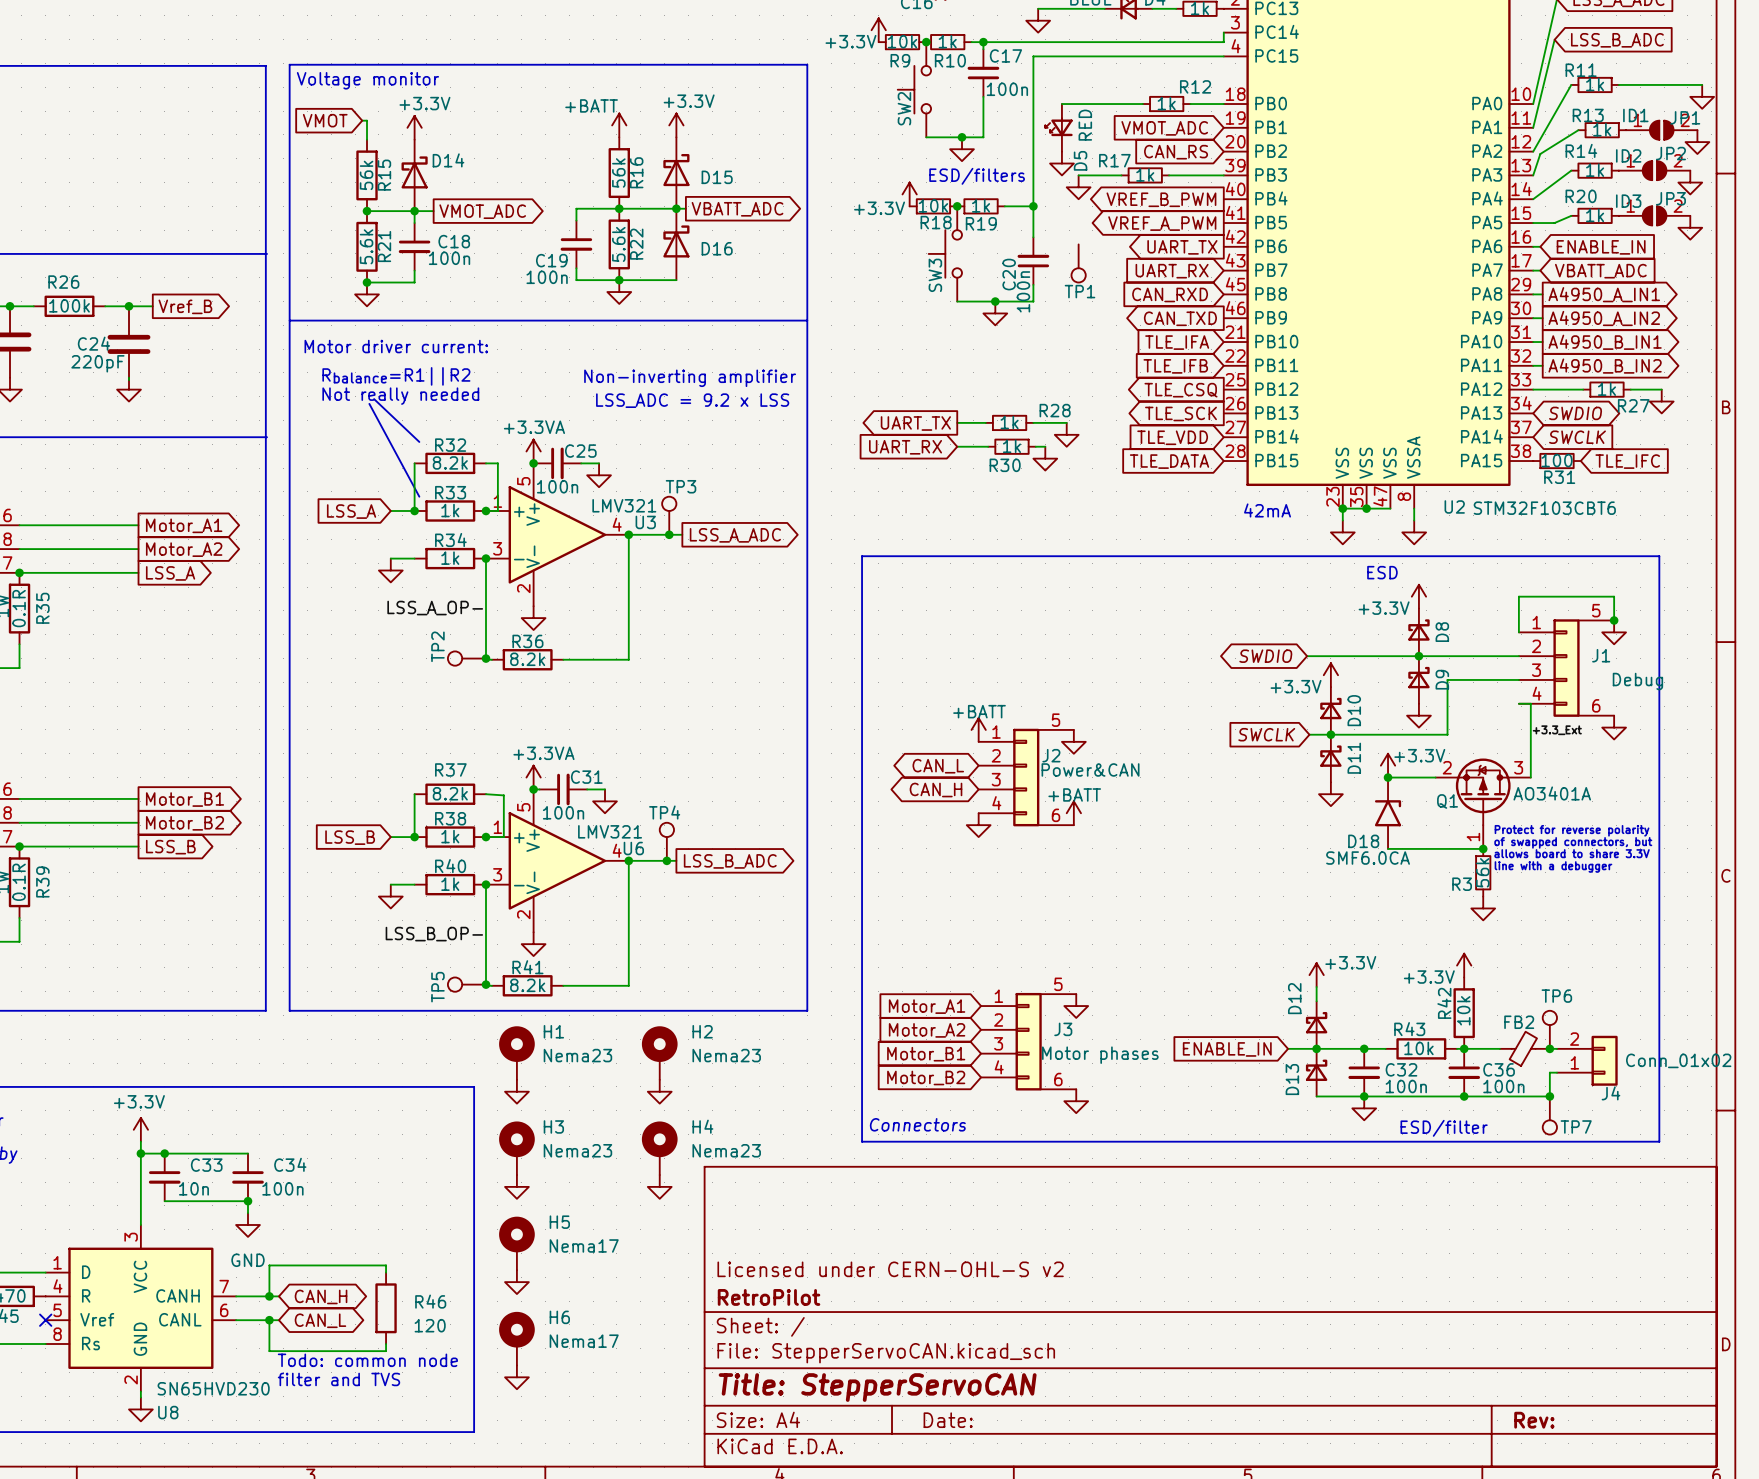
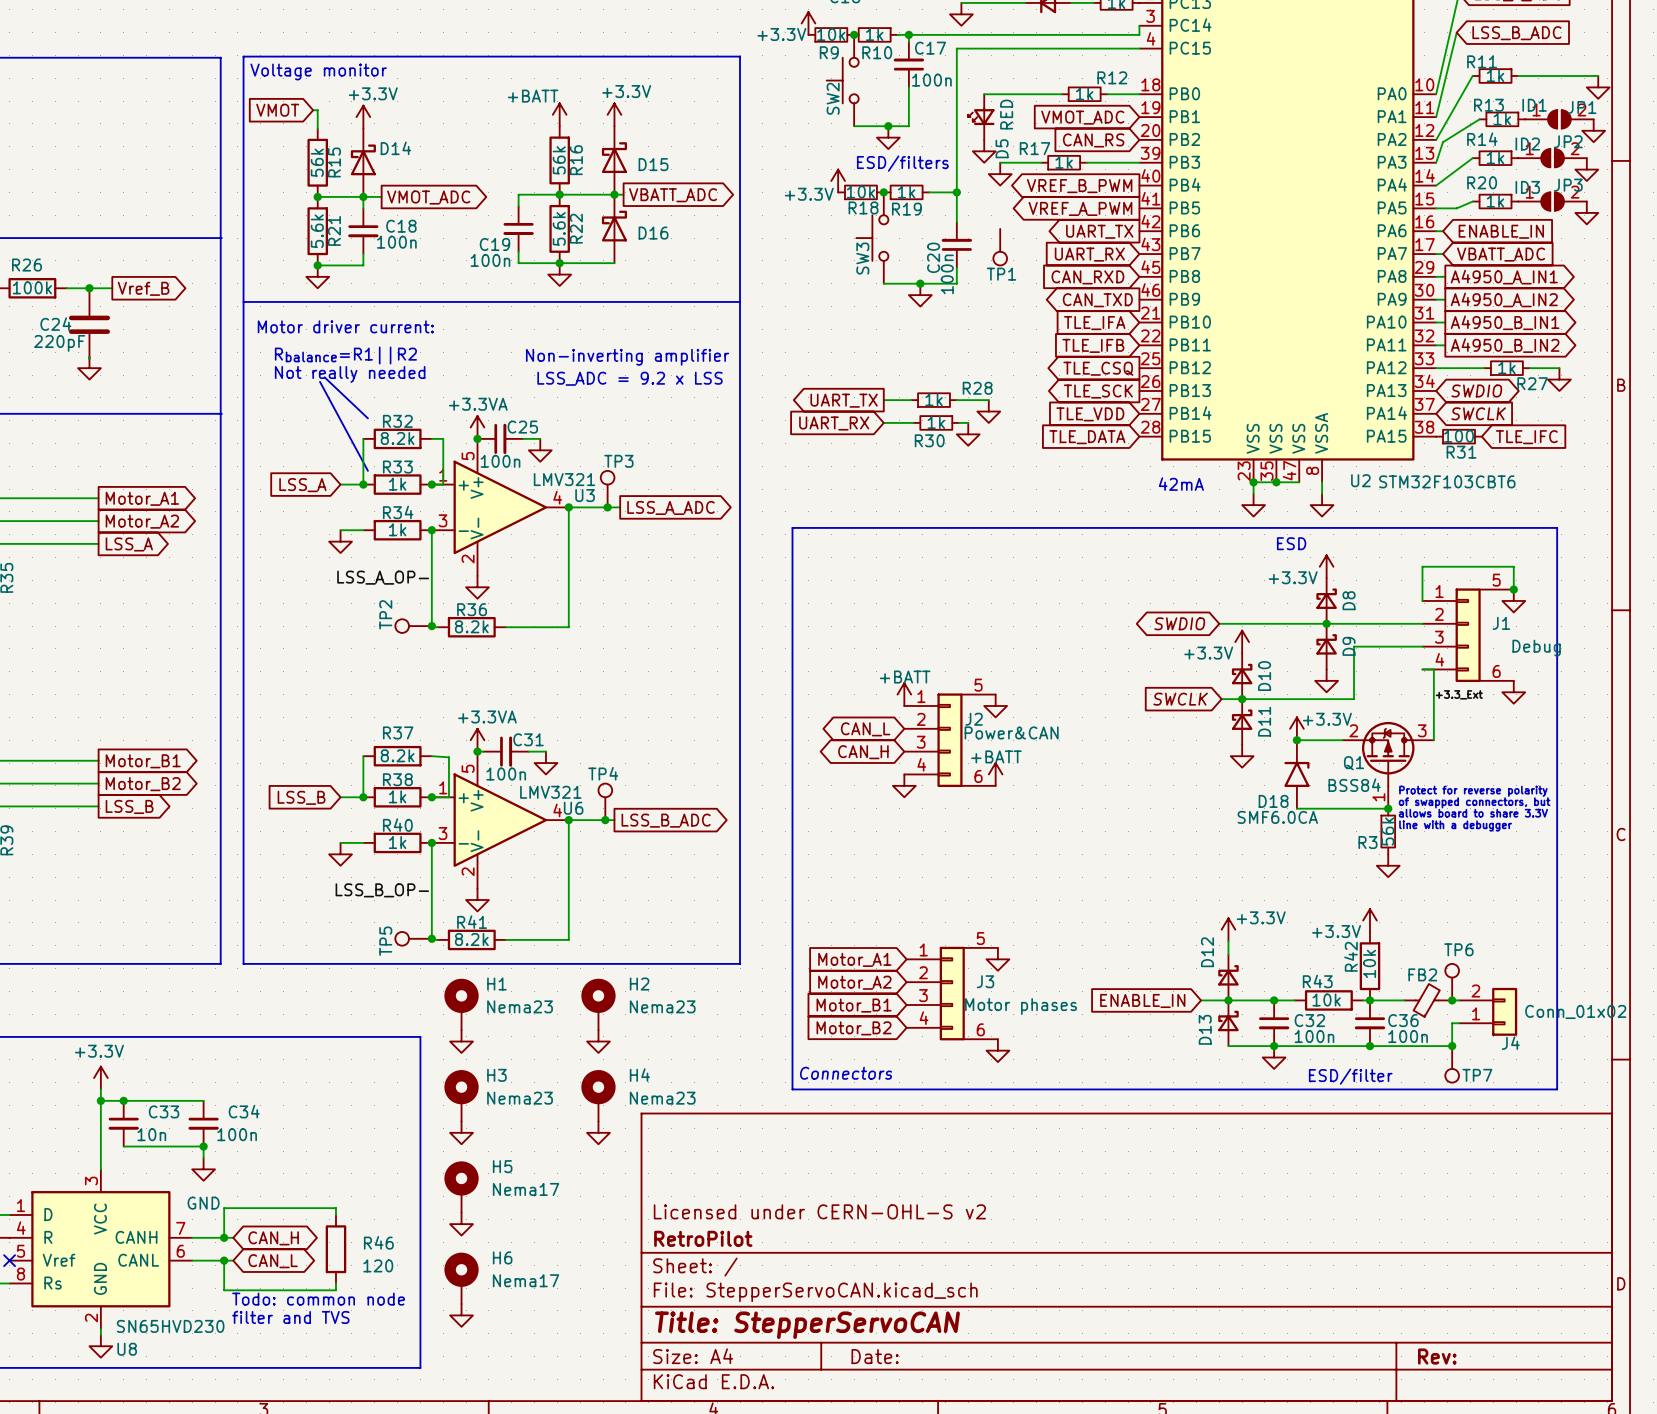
Q1 value: AO3401A (1552, 793) -> BSS84 (1354, 785)

